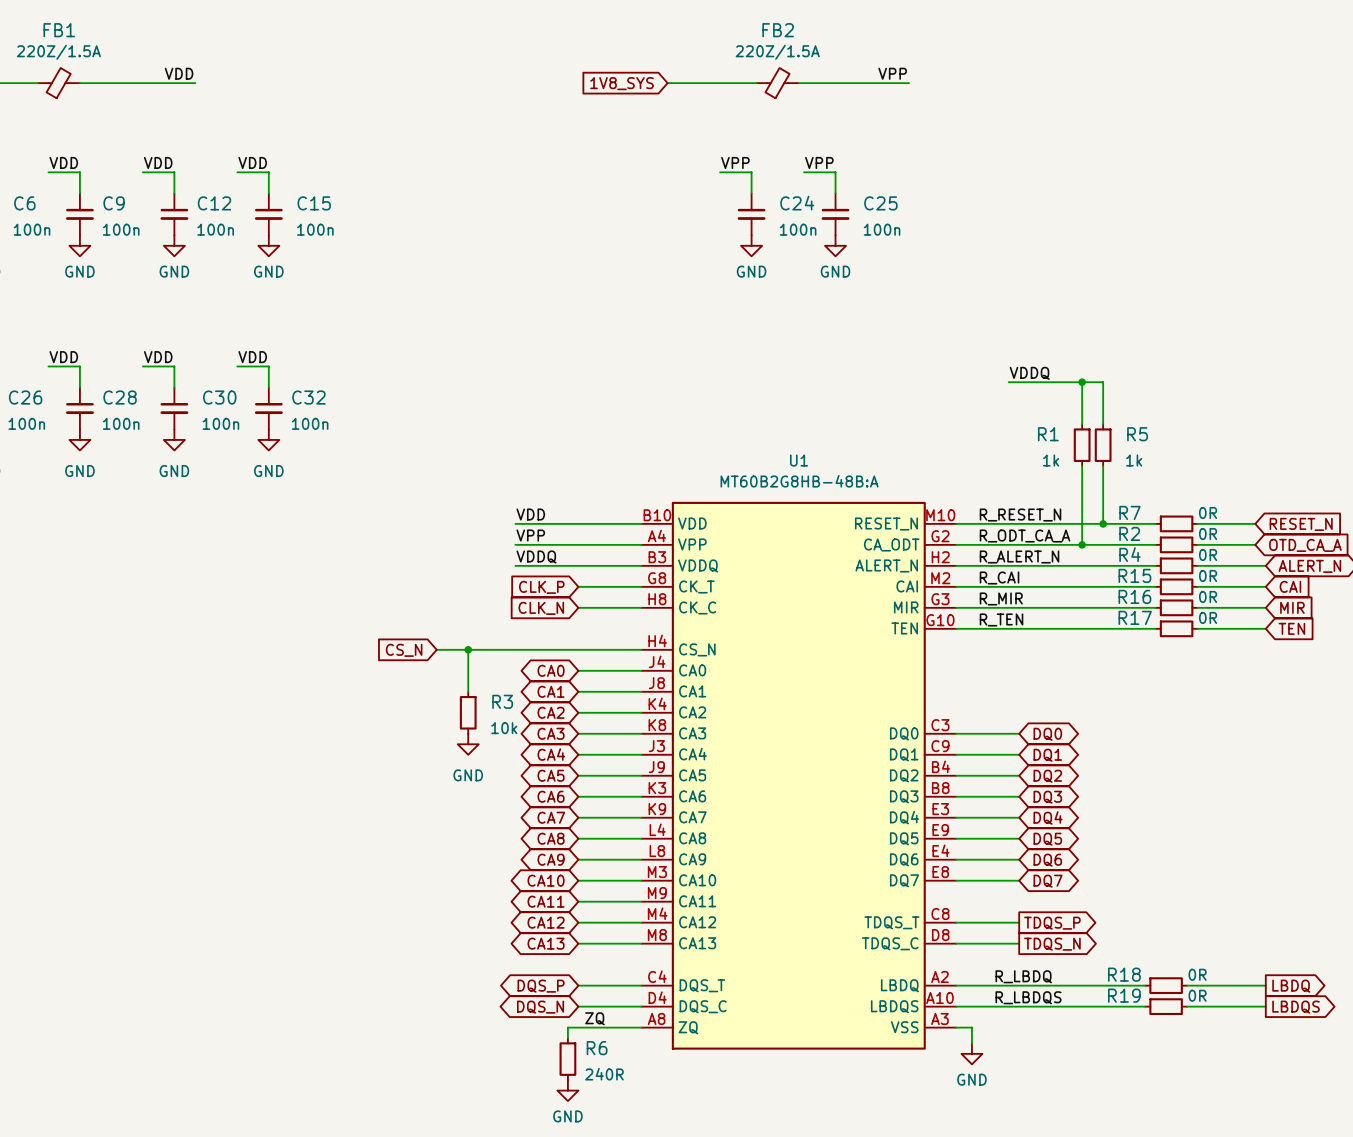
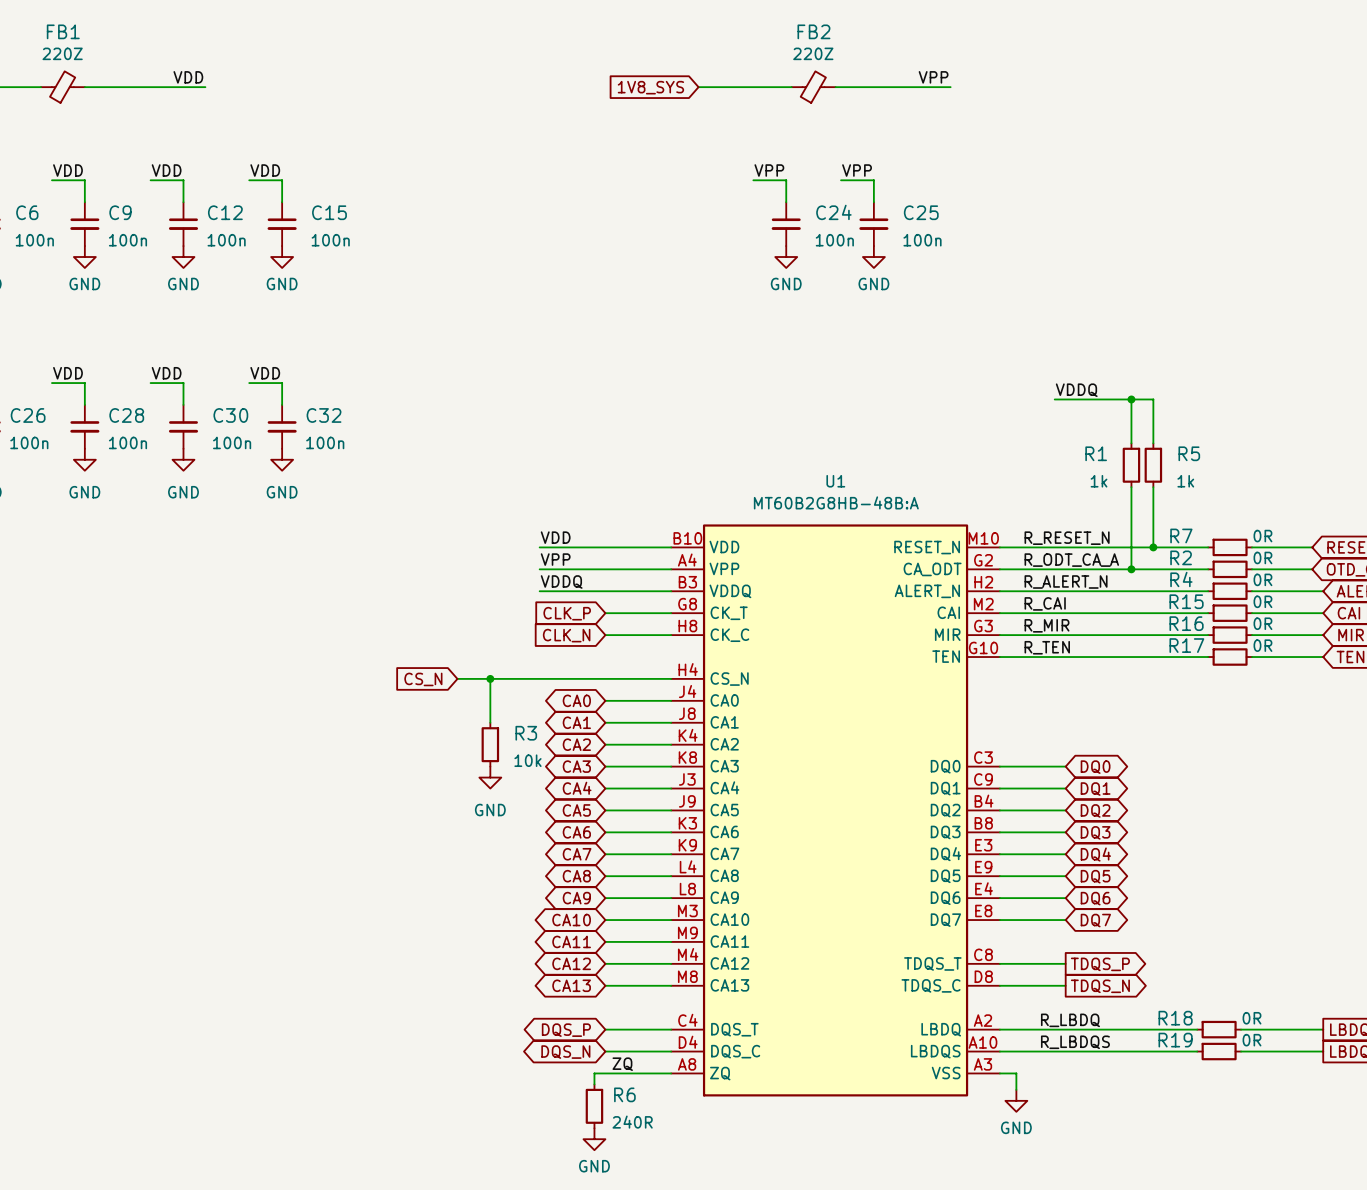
FB1 text: 220Z/1.5A (58, 52) -> 220Z (62, 53)
FB2 text: 220Z/1.5A (777, 52) -> 220Z (813, 53)

